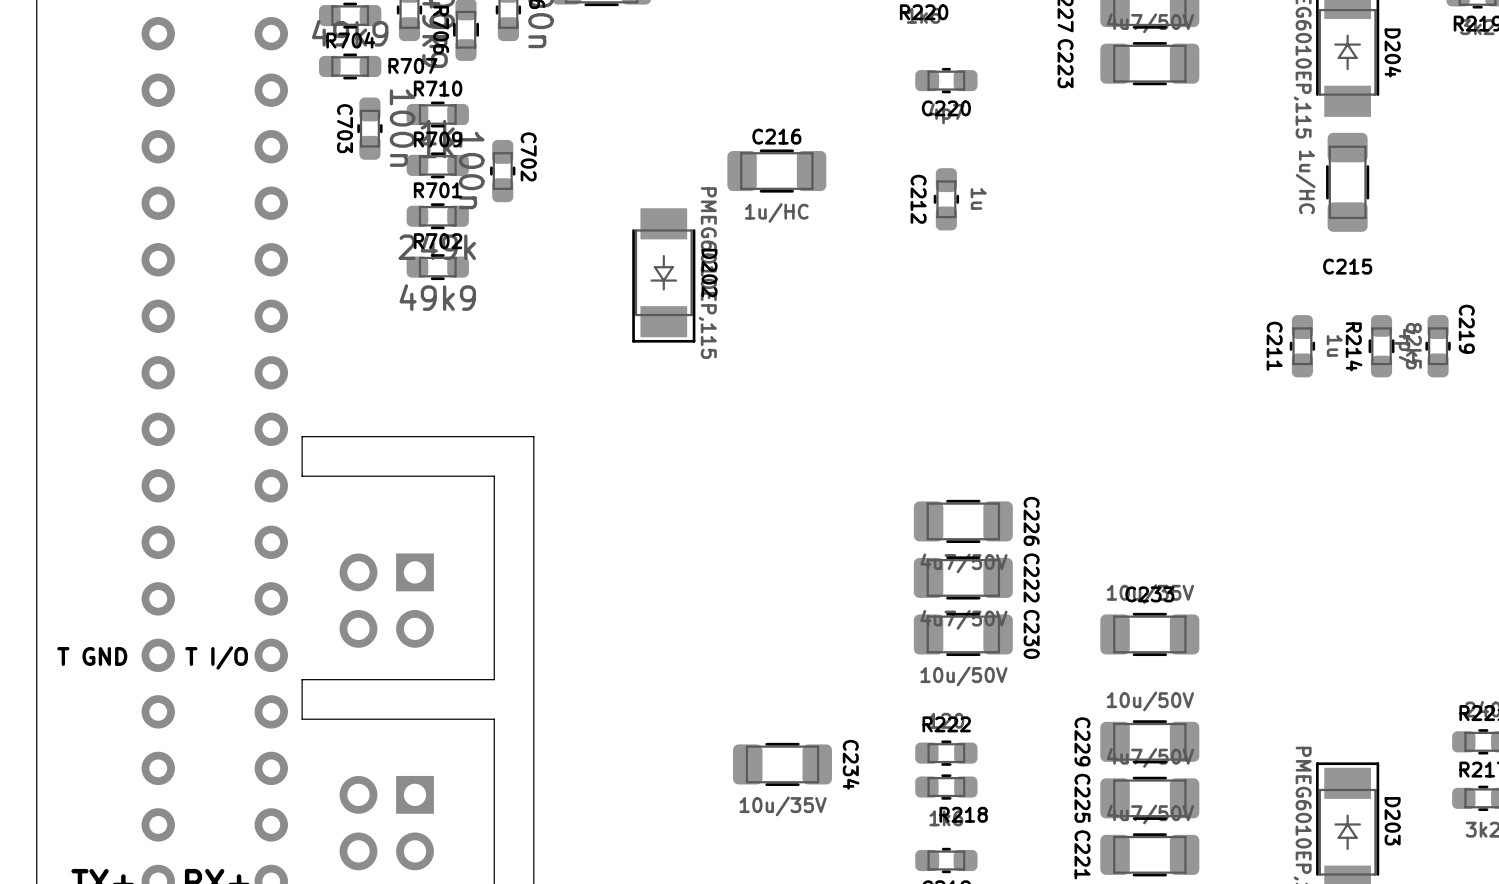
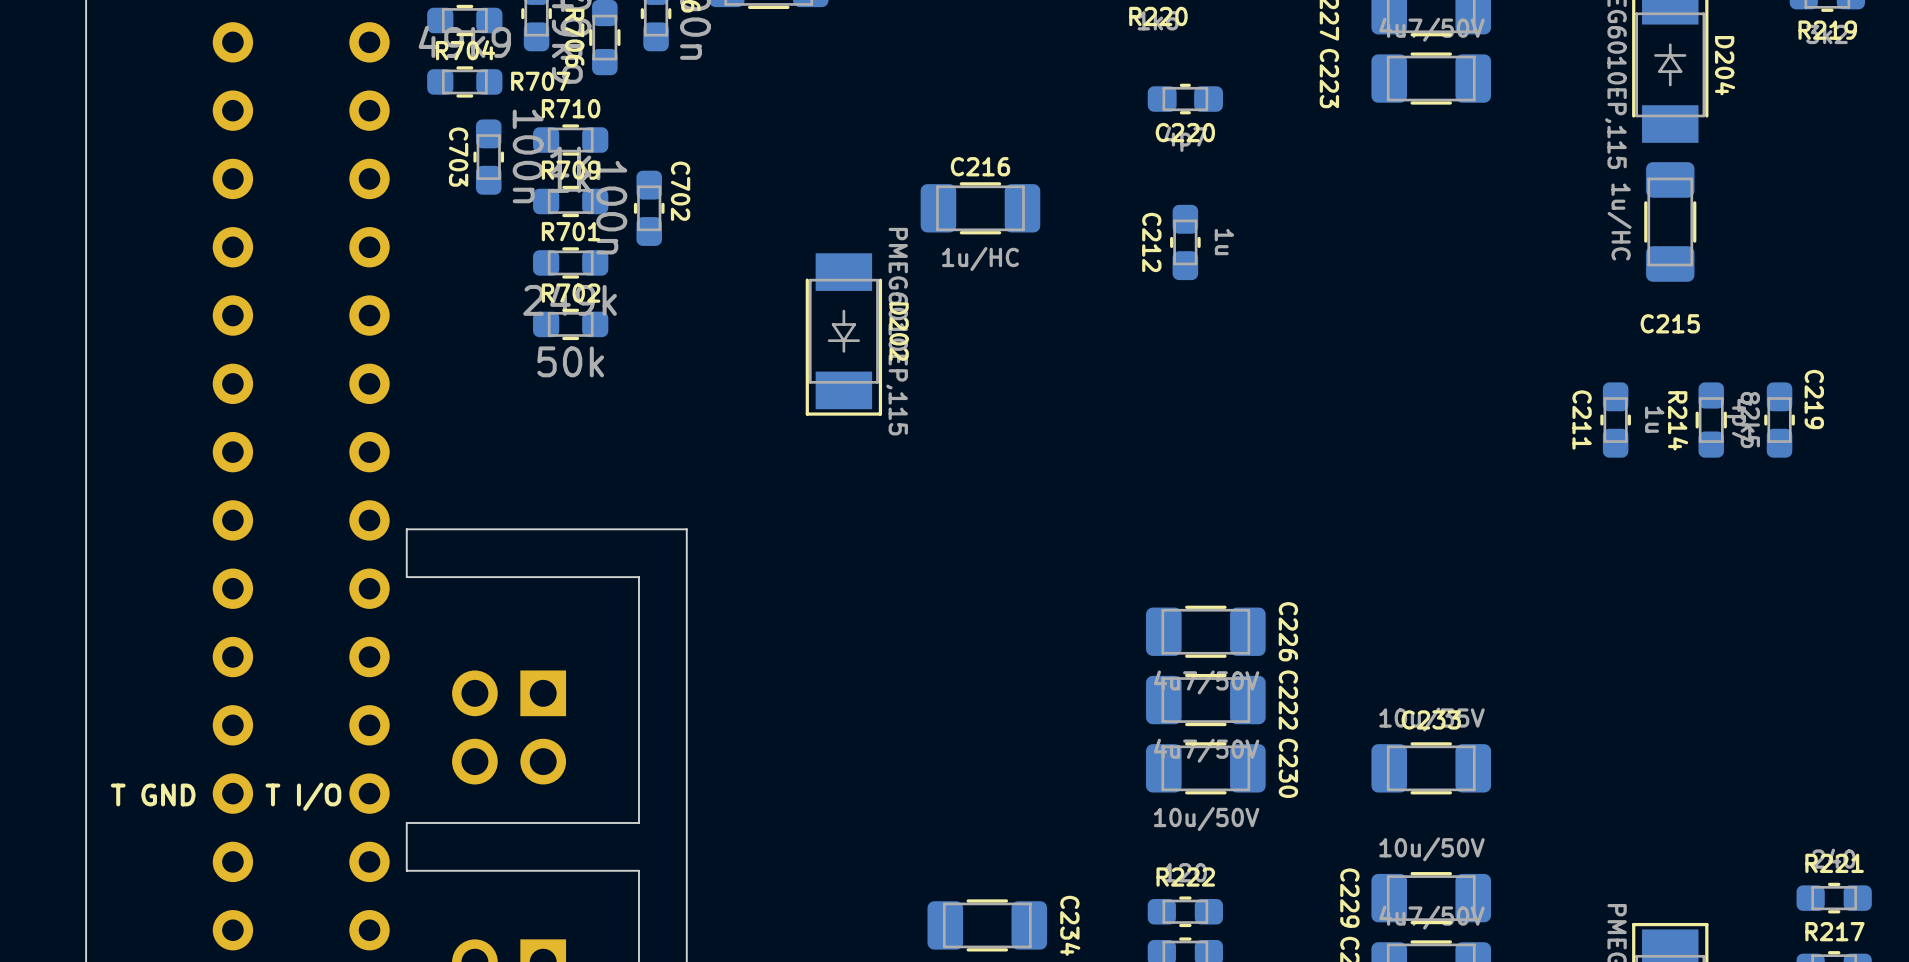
R702 value: 49k9 (437, 297) -> 50k (570, 361)

